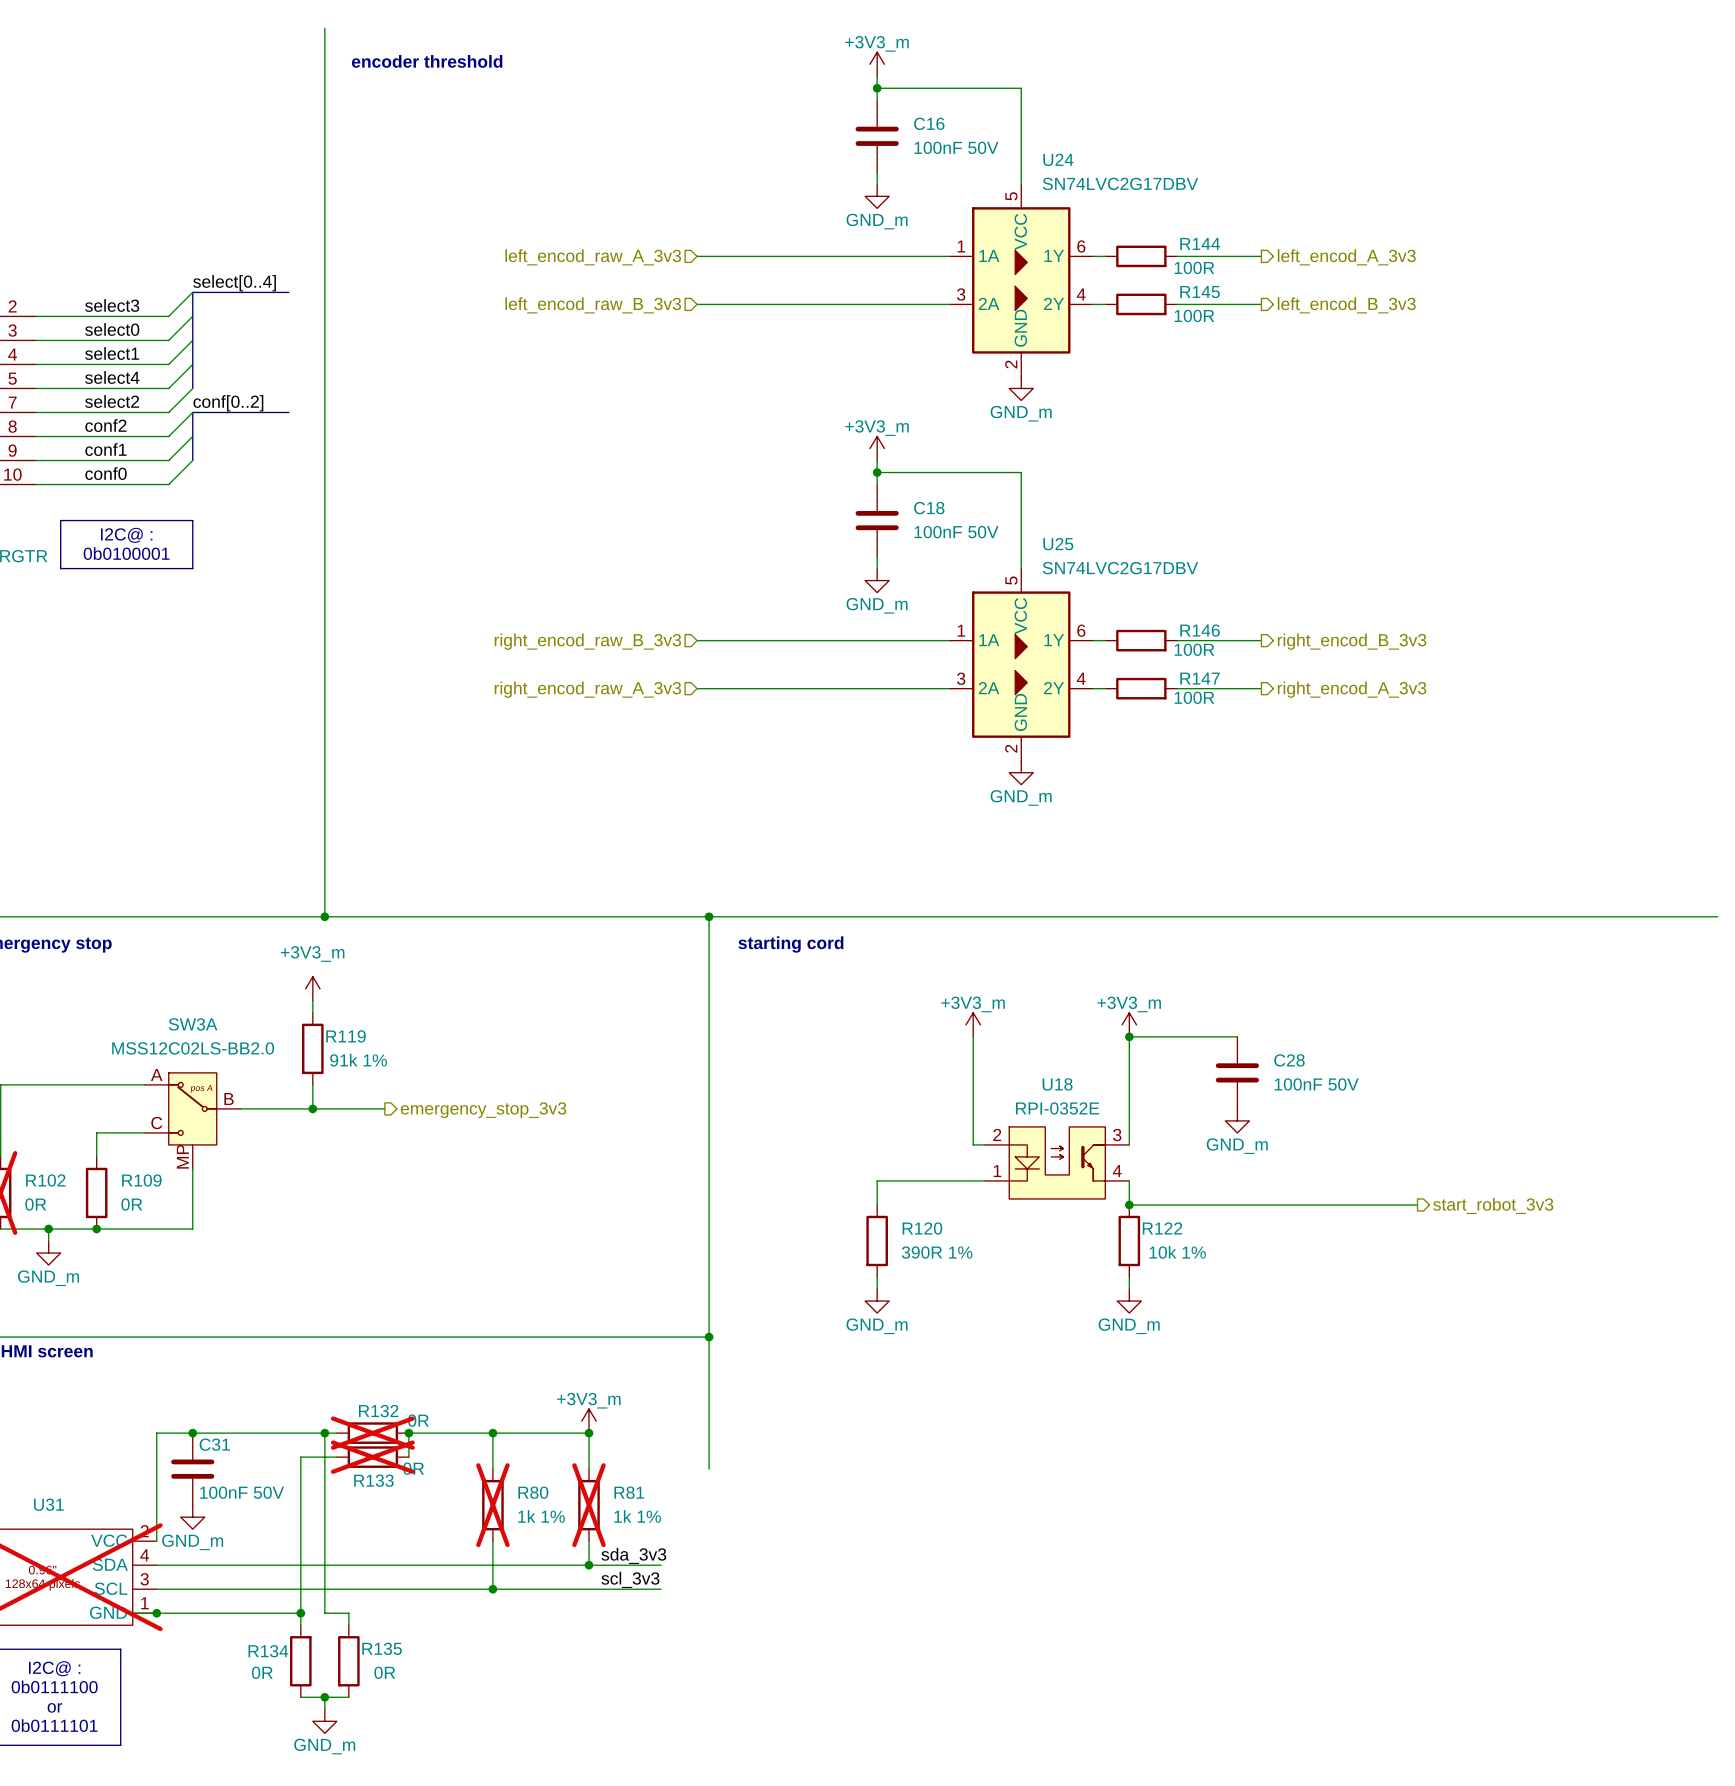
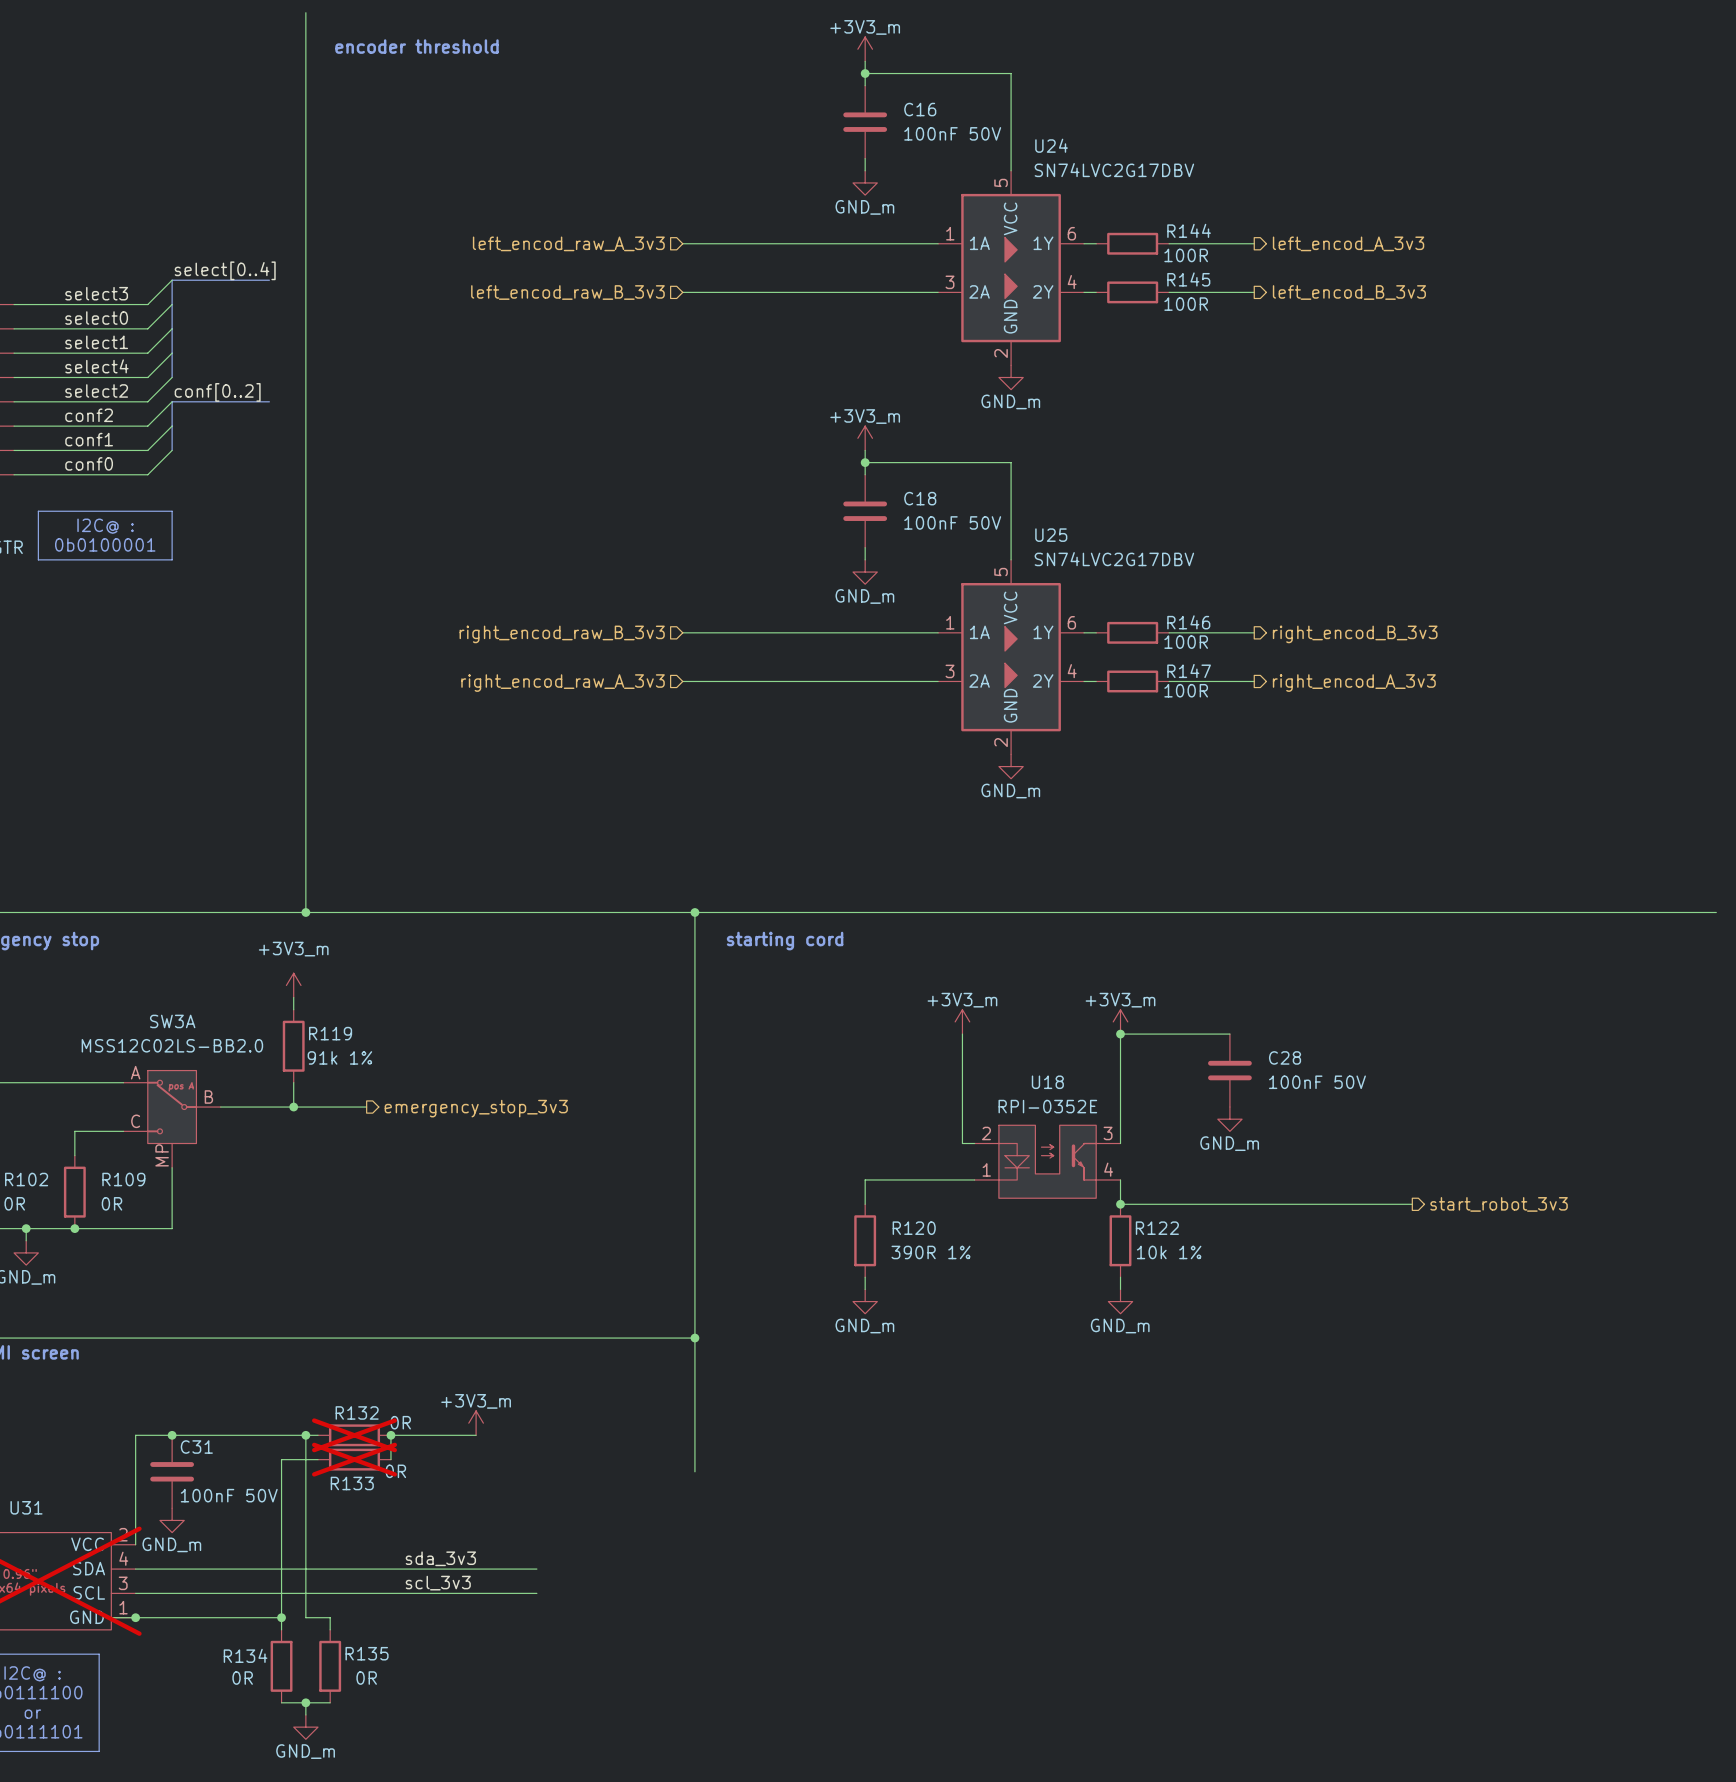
power symbol position: +3V3_m (588, 1421) -> +3V3_m (476, 1423)
junction: (492, 1433) -> none
junction: (588, 1433) -> none
wire: (492, 1469) (492, 1433) (588, 1433) (588, 1469) -> none
R80: 1k 1% (492, 1505) -> none
R81: 1k 1% (588, 1505) -> none
wire: (492, 1541) (492, 1589) -> none
wire: (588, 1541) (588, 1565) -> none
label position: sda_3v3 (633, 1555) -> sda_3v3 (440, 1558)
wire: (552, 1565) (661, 1565) -> none
junction: (588, 1565) -> none
label position: scl_3v3 (630, 1579) -> scl_3v3 (438, 1583)
junction: (492, 1589) -> none
wire: (552, 1589) (661, 1589) -> none

